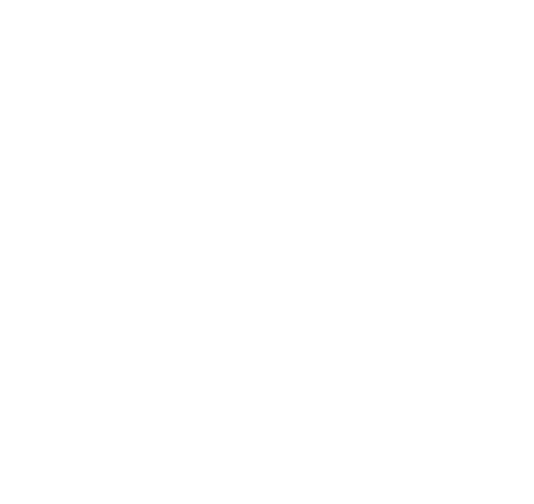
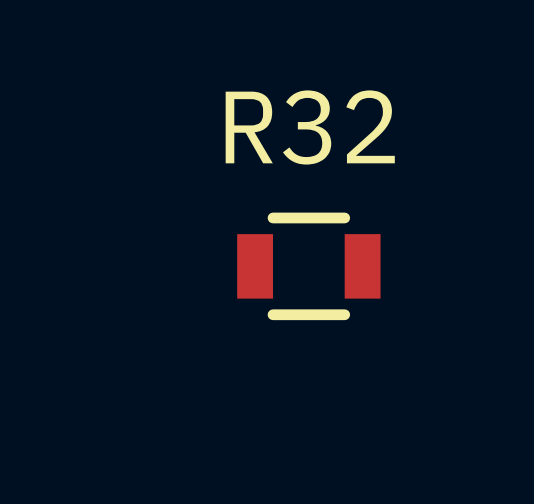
R32: none -> (308, 266)

